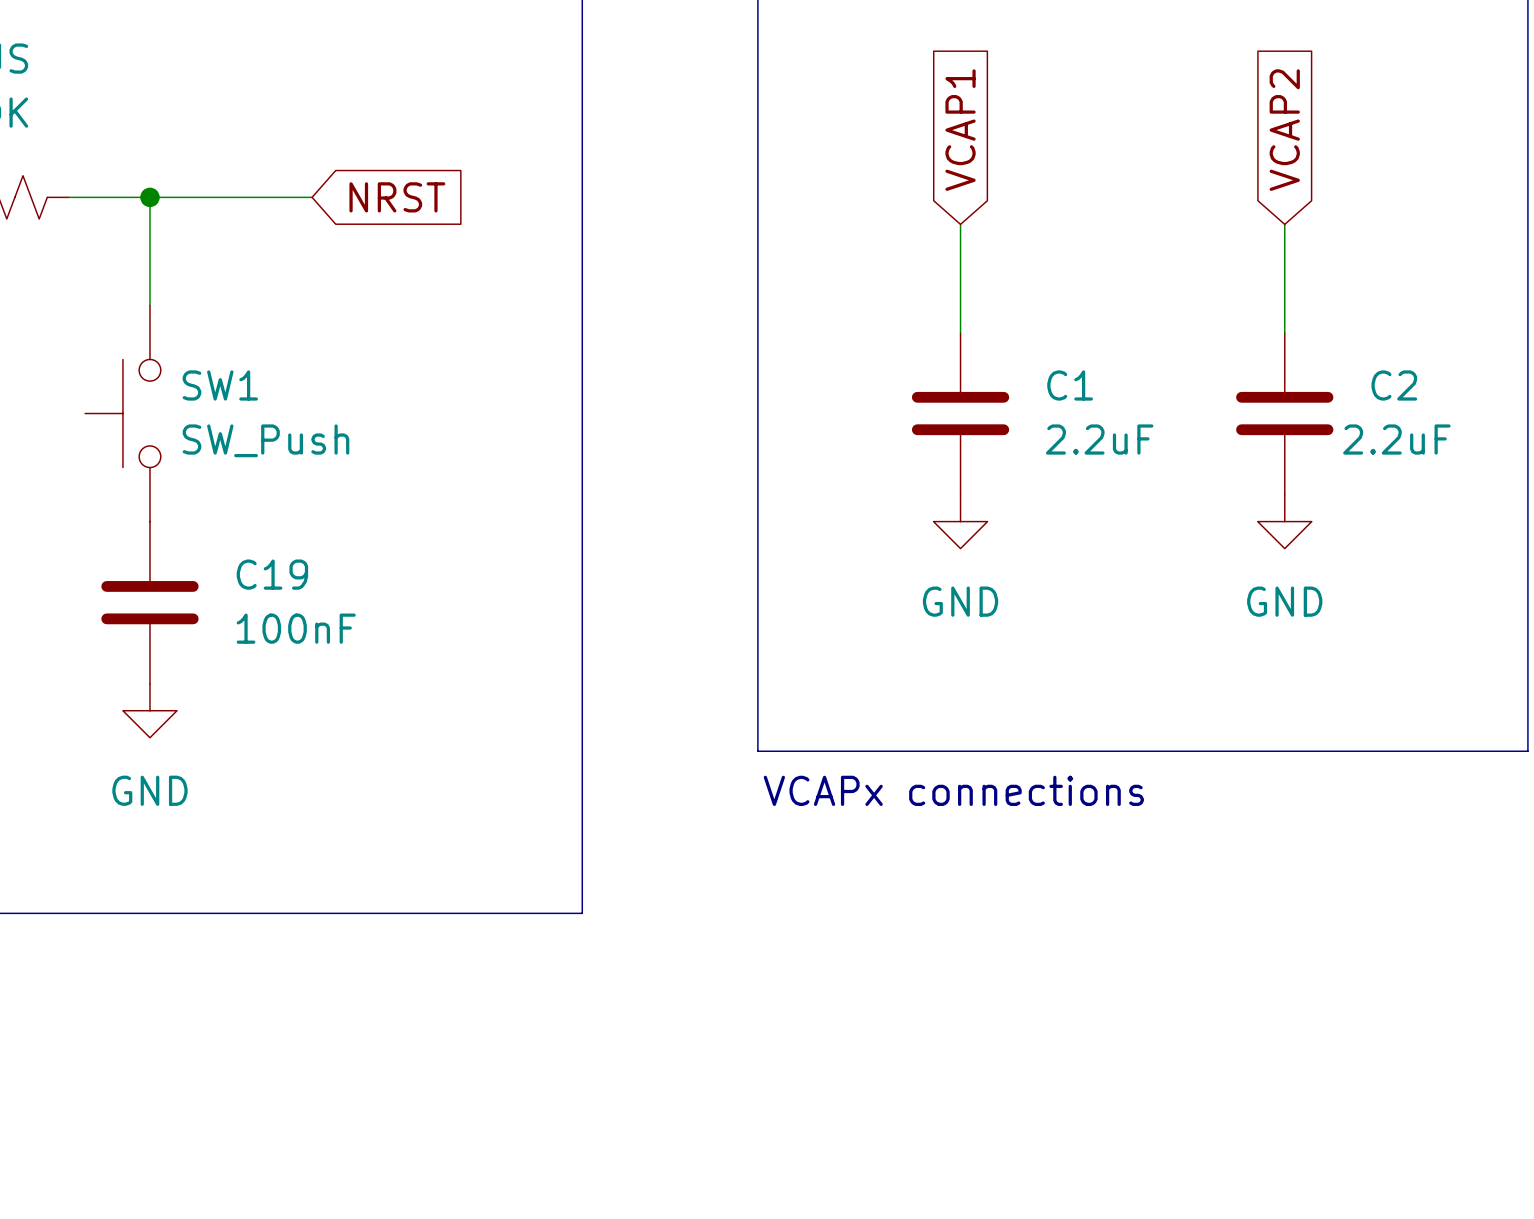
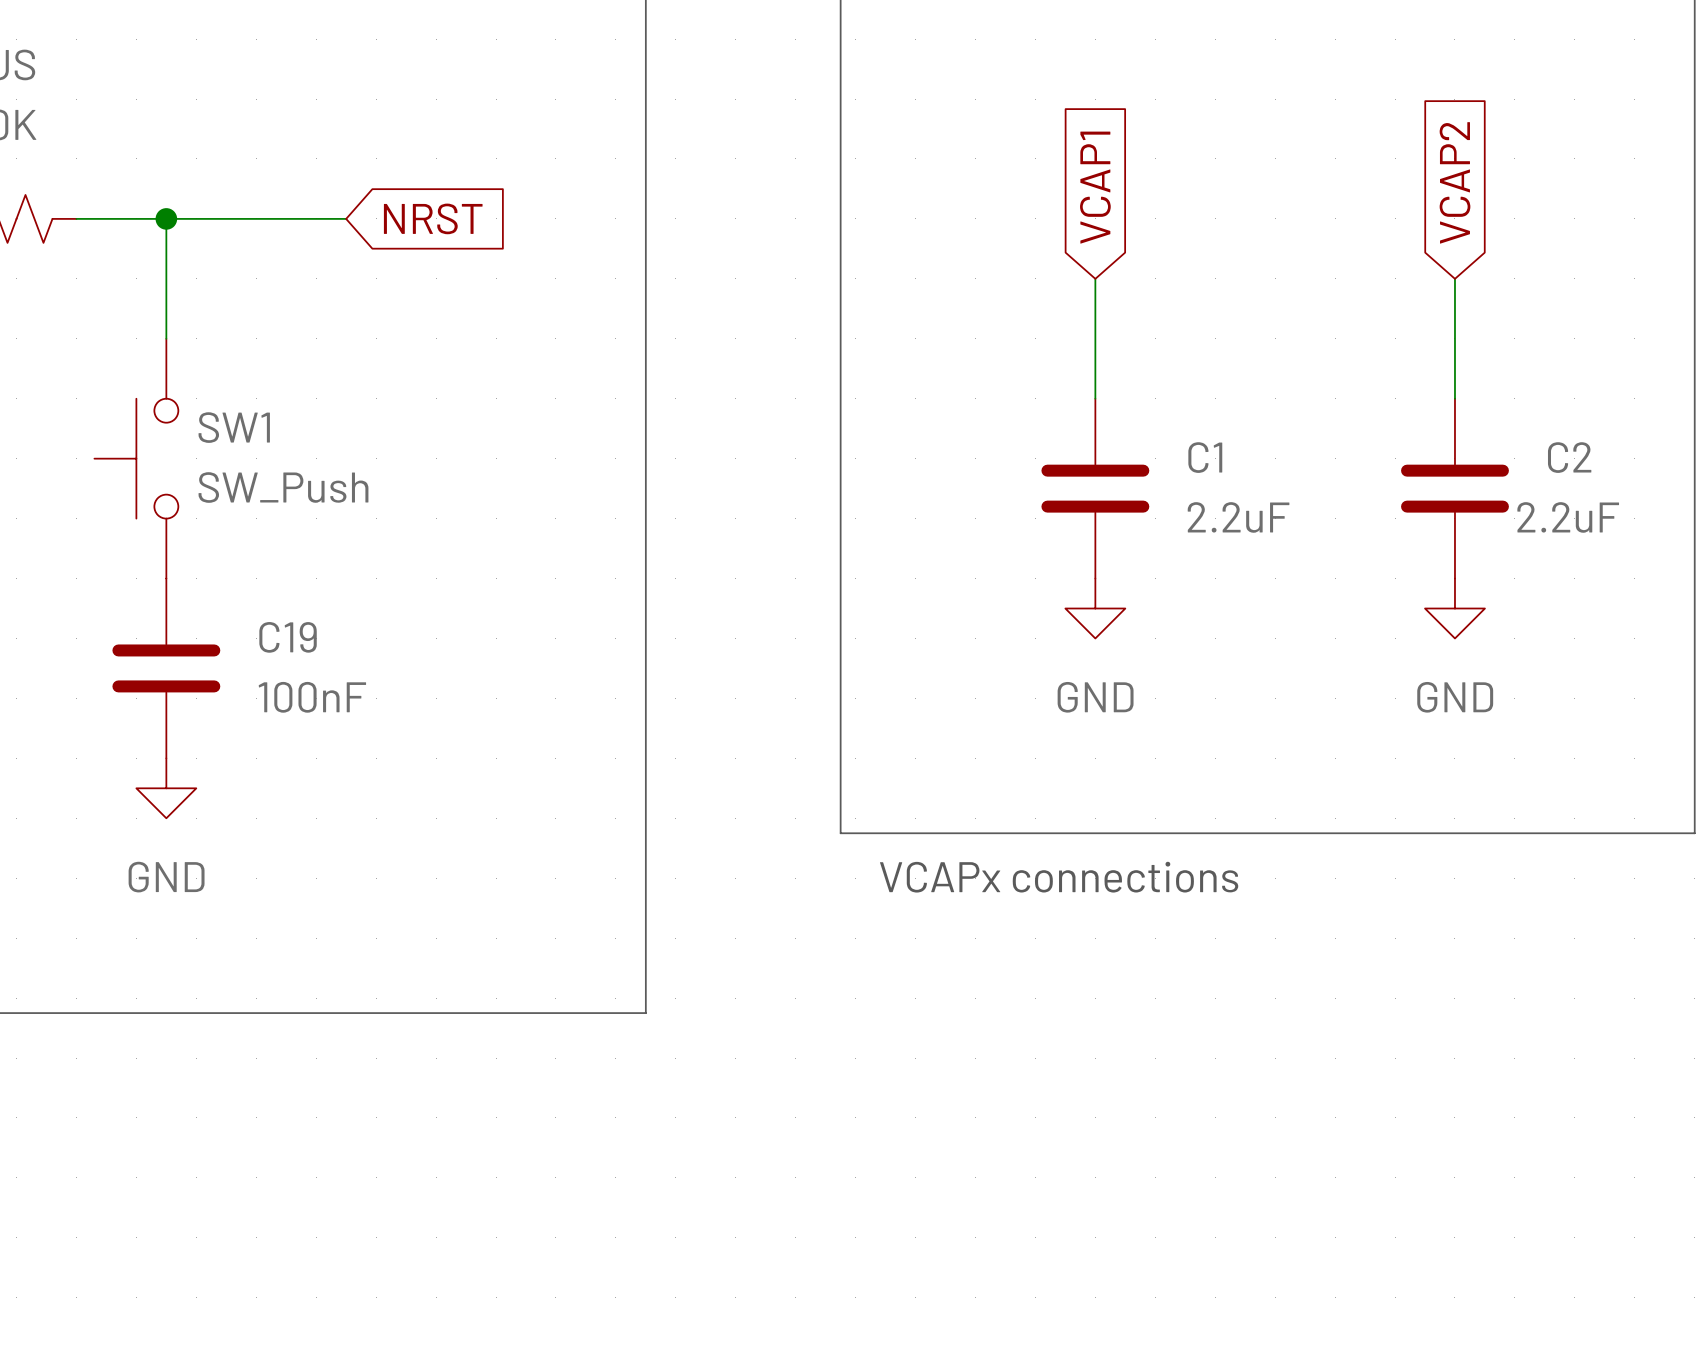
global label position: VCAP1 (960, 130) -> VCAP1 (1095, 187)
global label position: VCAP2 (1284, 130) -> VCAP2 (1455, 182)
wire: (960, 224) (960, 332) -> (1095, 278) (1095, 398)
wire: (1284, 224) (1284, 332) -> (1454, 278) (1454, 398)
C1 position: (960, 413) -> (1095, 488)
C2 position: (1284, 413) -> (1454, 488)
power symbol position: GND (960, 521) -> GND (1095, 608)
power symbol position: GND (1284, 521) -> GND (1454, 608)

